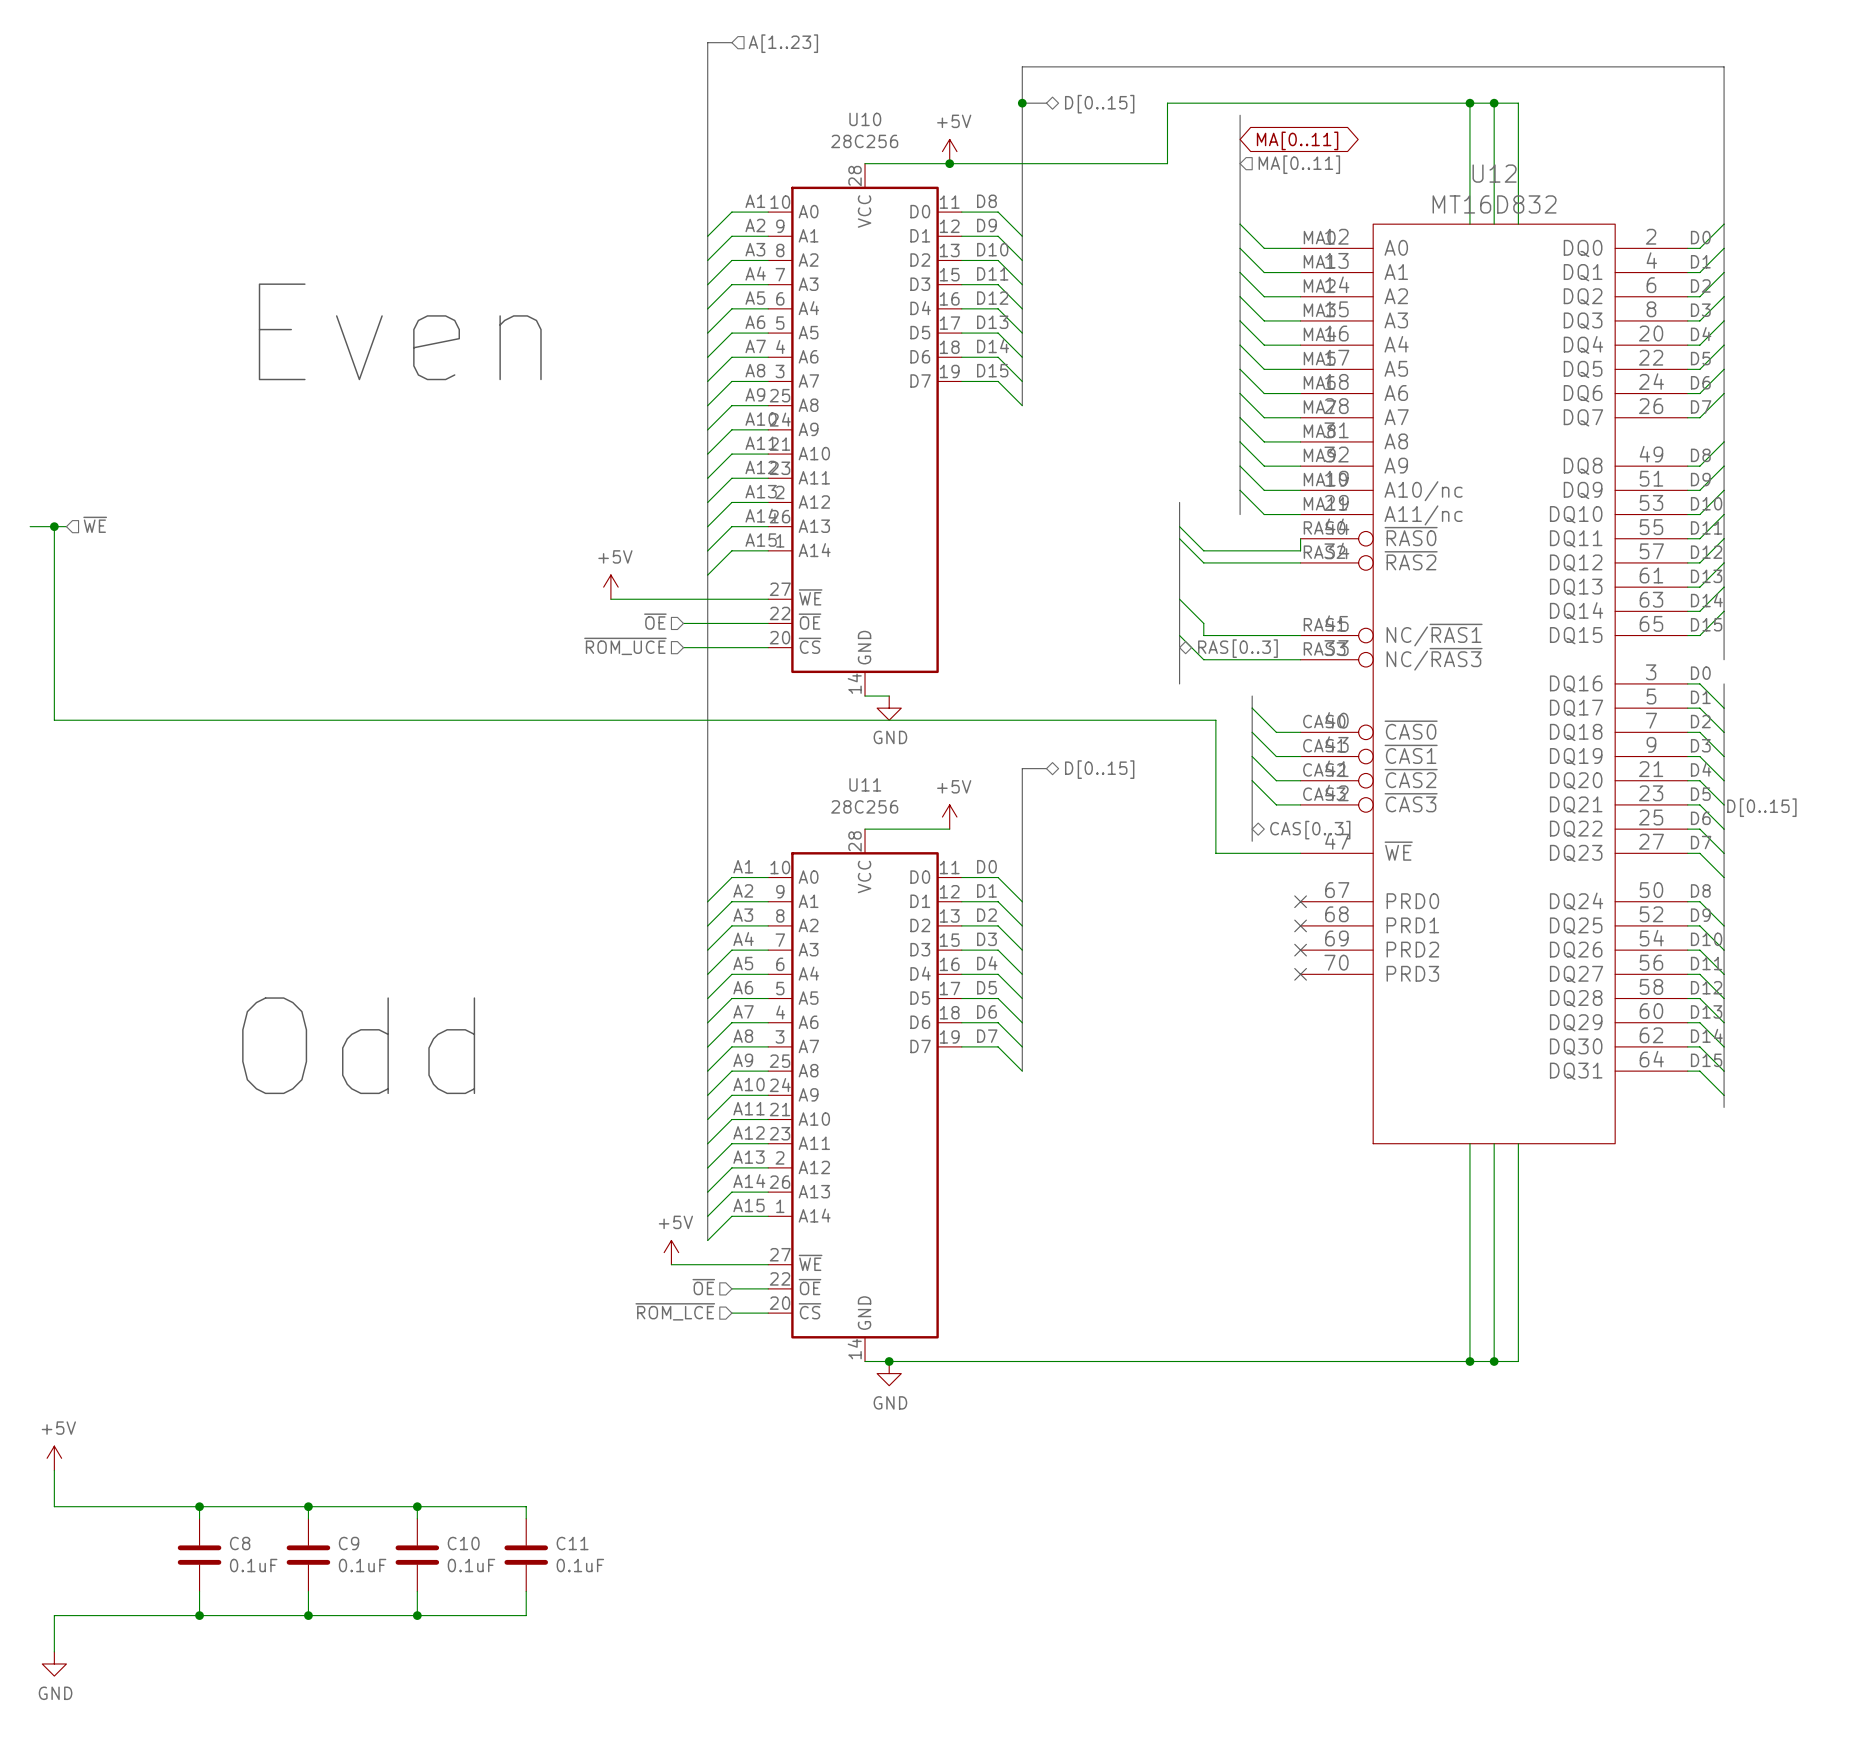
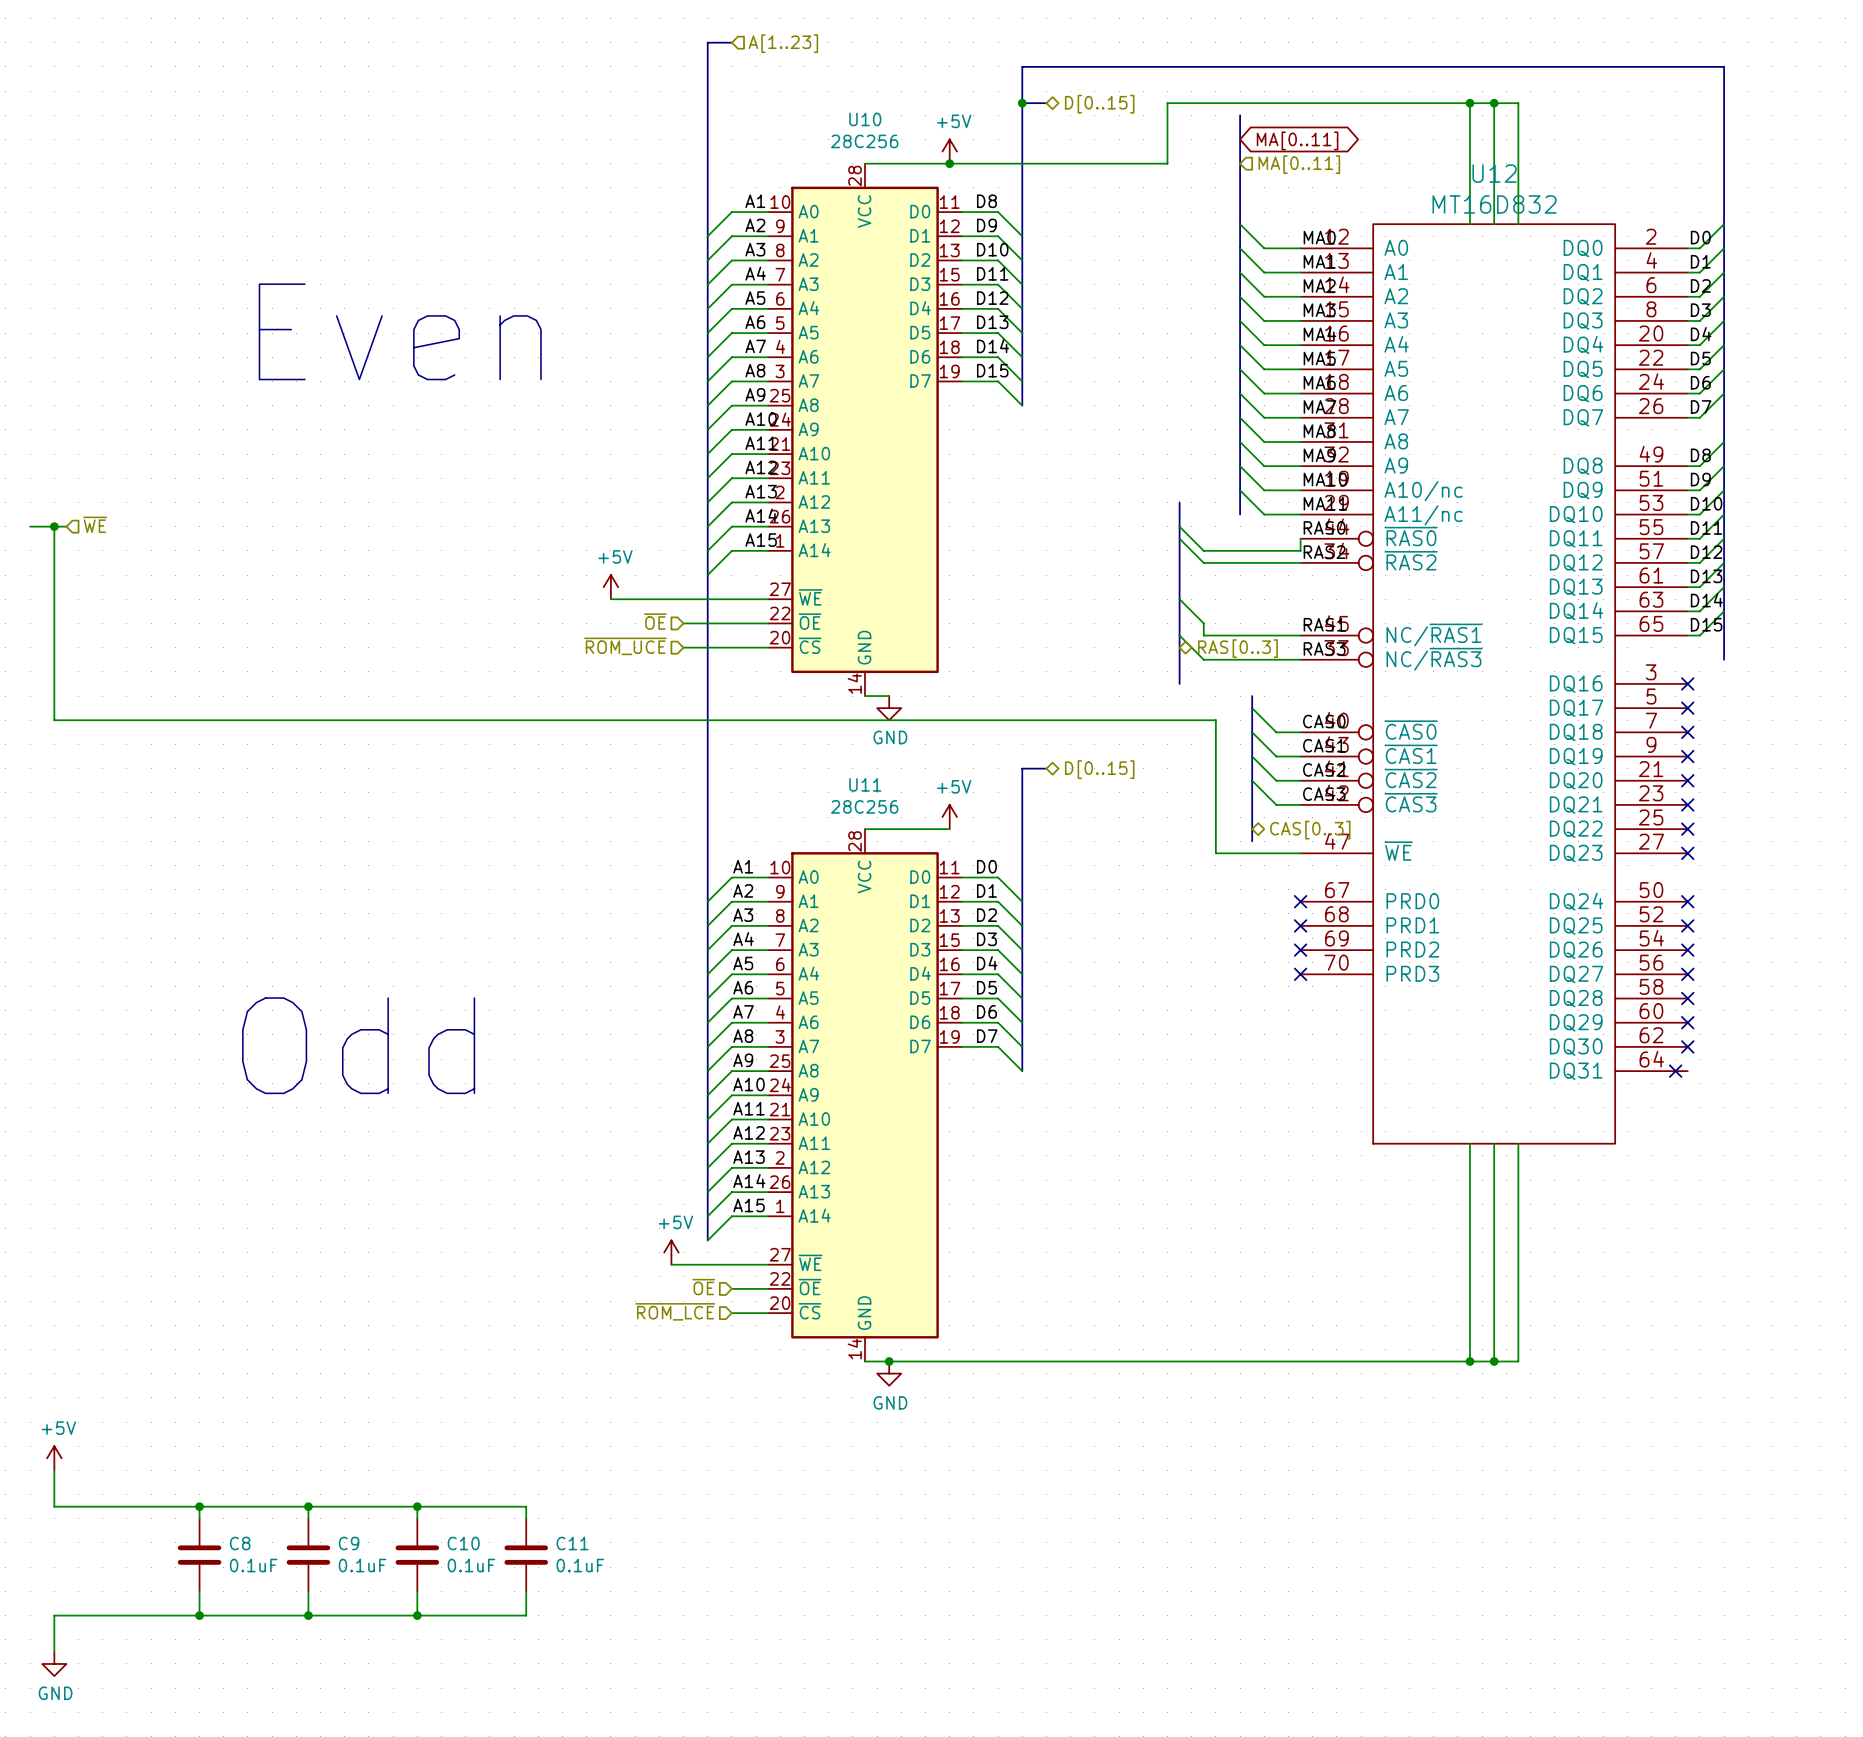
label: D0 (1700, 673) -> none
wire: (1687, 683) (1699, 683) (1724, 708) -> none
no-connect mark: none -> (1687, 683)
bus: (1724, 683) (1724, 1107) -> none
label: D1 (1700, 697) -> none
wire: (1687, 708) (1699, 708) (1724, 732) -> none
no-connect mark: none -> (1687, 708)
label: D2 (1700, 721) -> none
wire: (1687, 732) (1699, 732) (1724, 756) -> none
no-connect mark: none -> (1687, 732)
label: D3 (1700, 745) -> none
wire: (1687, 756) (1699, 756) (1724, 780) -> none
no-connect mark: none -> (1687, 756)
label: D4 (1701, 769) -> none
wire: (1687, 780) (1699, 780) (1724, 804) -> none
no-connect mark: none -> (1687, 780)
label: D5 (1700, 794) -> none
wire: (1687, 804) (1699, 804) (1724, 829) -> none
no-connect mark: none -> (1687, 804)
label: D[0..15] (1761, 807) -> none
label: D6 (1700, 818) -> none
wire: (1687, 829) (1699, 829) (1724, 853) -> none
no-connect mark: none -> (1687, 829)
label: D7 (1701, 842) -> none
wire: (1687, 853) (1699, 853) (1724, 877) -> none
no-connect mark: none -> (1687, 853)
label: D8 (1700, 890) -> none
wire: (1687, 901) (1699, 901) (1724, 925) -> none
no-connect mark: none -> (1687, 901)
label: D9 (1700, 915) -> none
wire: (1687, 925) (1699, 925) (1724, 950) -> none
no-connect mark: none -> (1687, 925)
label: D10 (1706, 939) -> none
wire: (1687, 950) (1699, 950) (1724, 974) -> none
no-connect mark: none -> (1687, 950)
label: D11 (1706, 963) -> none
wire: (1687, 974) (1699, 974) (1724, 998) -> none
no-connect mark: none -> (1687, 974)
label: D12 (1706, 987) -> none
wire: (1687, 998) (1699, 998) (1724, 1022) -> none
no-connect mark: none -> (1687, 998)
label: D13 (1706, 1011) -> none
wire: (1687, 1022) (1699, 1022) (1724, 1046) -> none
no-connect mark: none -> (1687, 1022)
label: D14 (1706, 1035) -> none
wire: (1687, 1046) (1699, 1046) (1724, 1071) -> none
no-connect mark: none -> (1687, 1046)
label: D15 (1706, 1060) -> none
no-connect mark: none -> (1675, 1071)
wire: (1687, 1071) (1699, 1071) (1724, 1095) -> none

